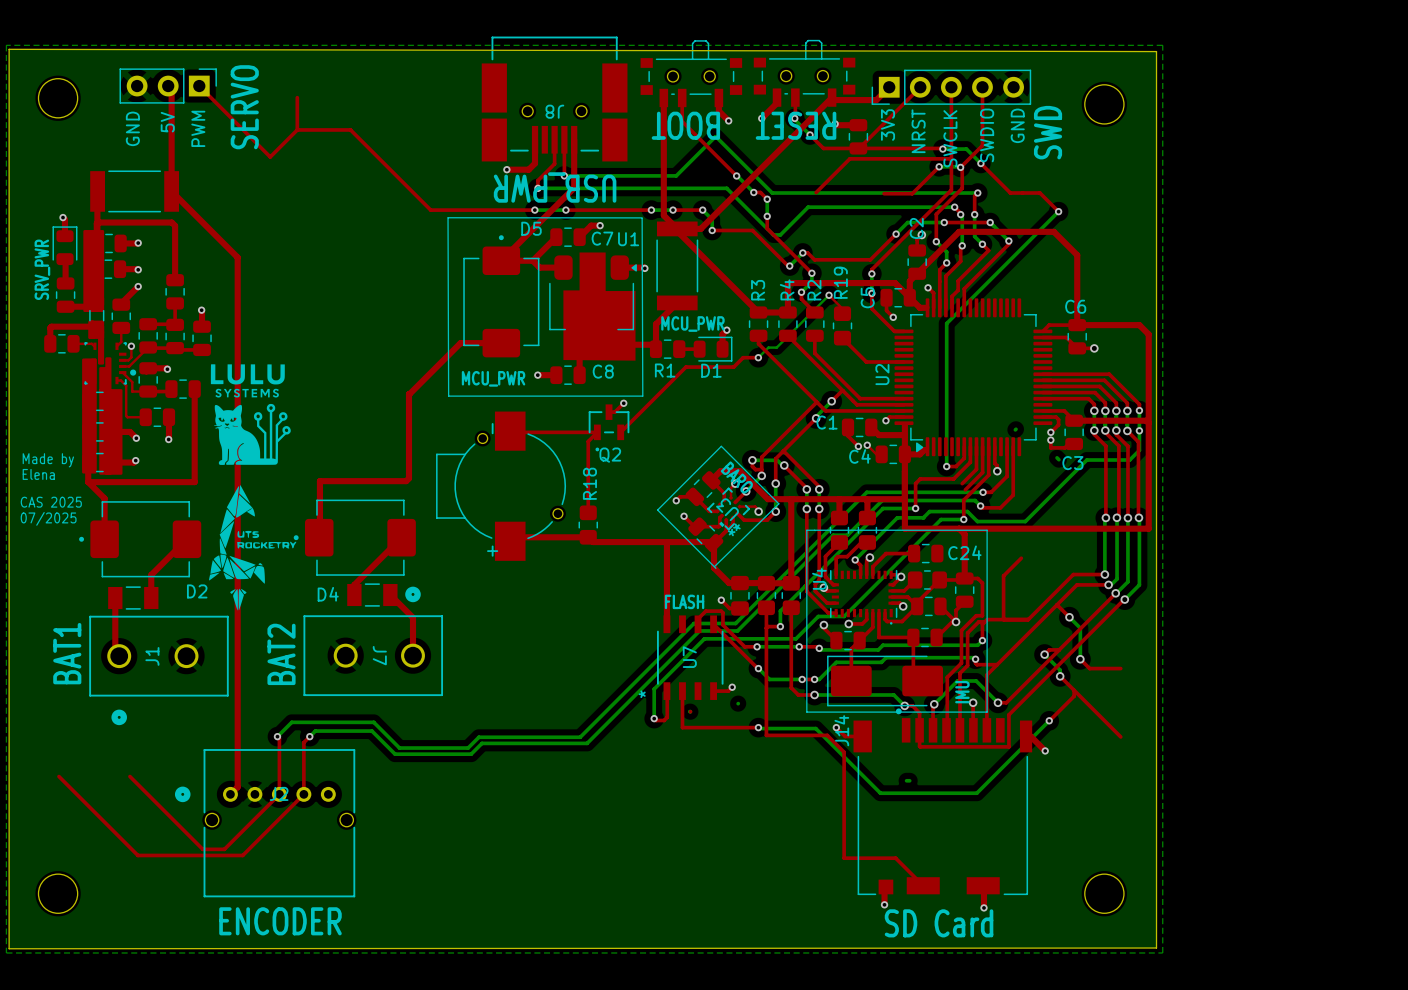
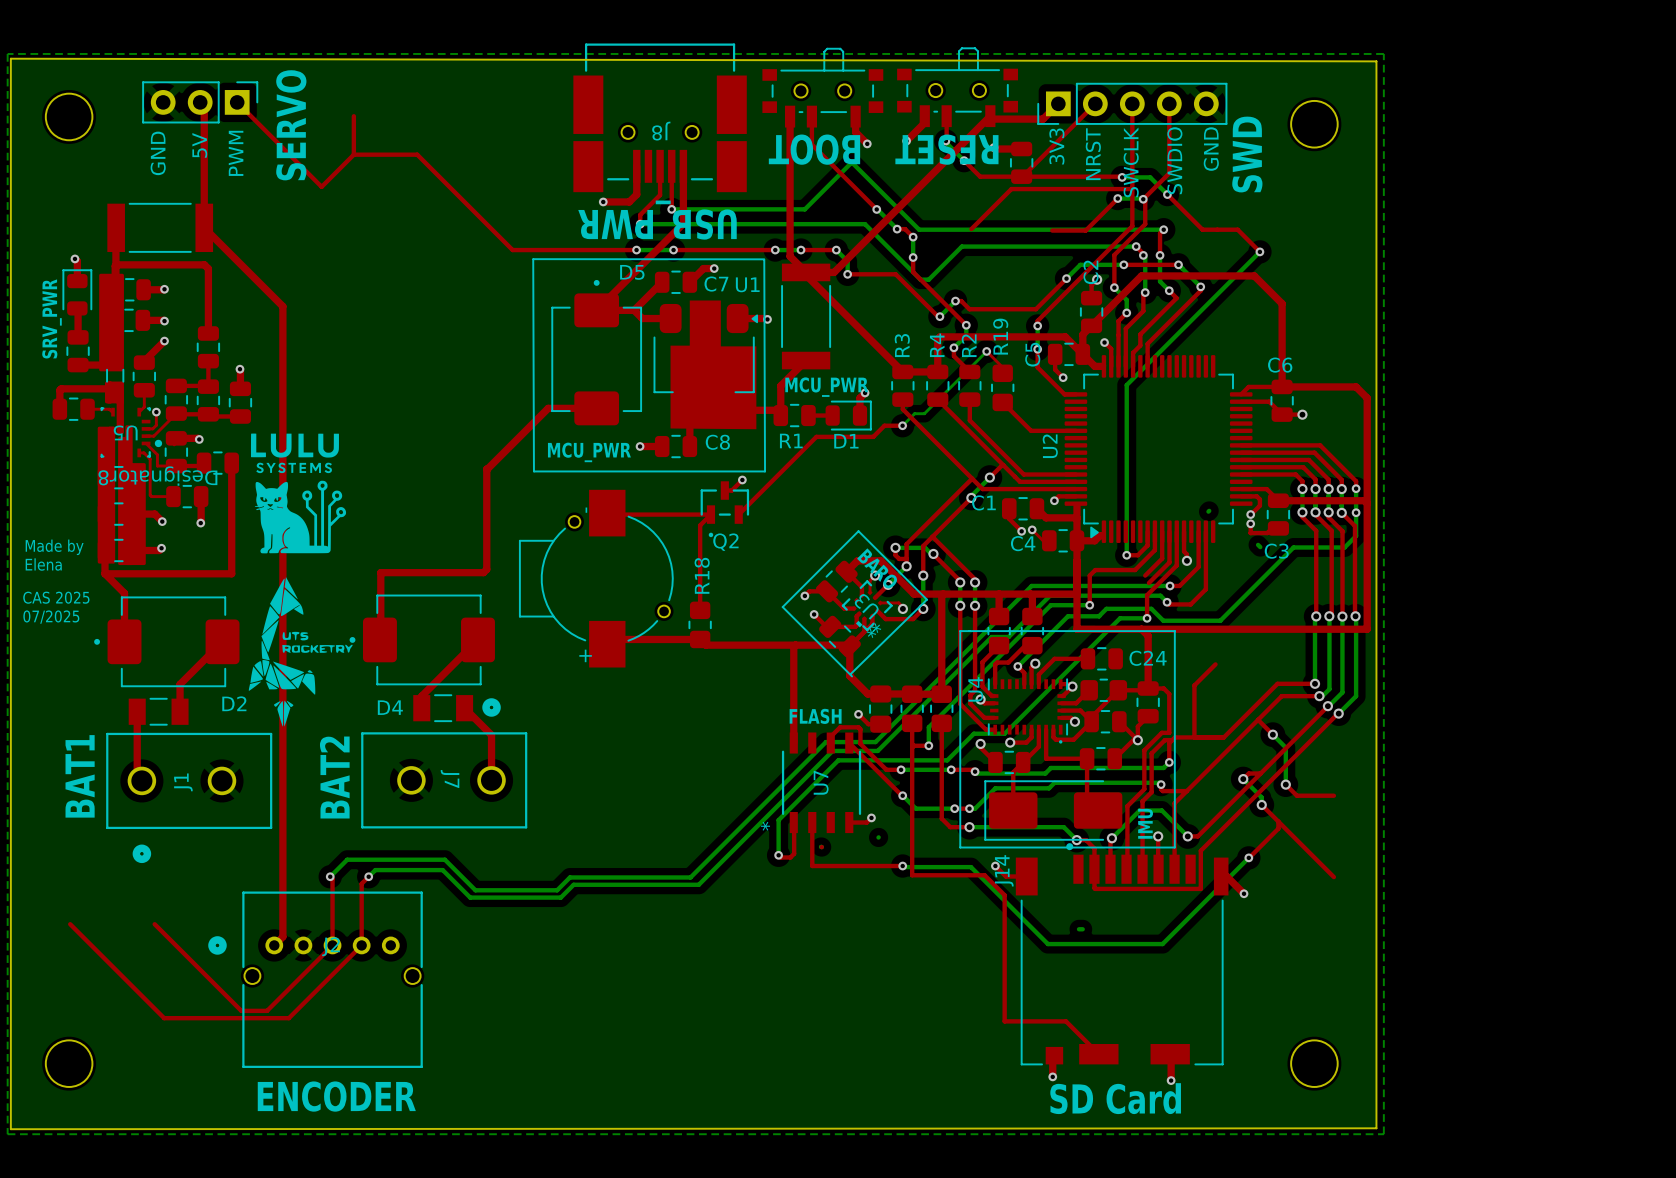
U5 name: none -> U5 (125, 432)
U5 text: none -> Designator8 (157, 476)

